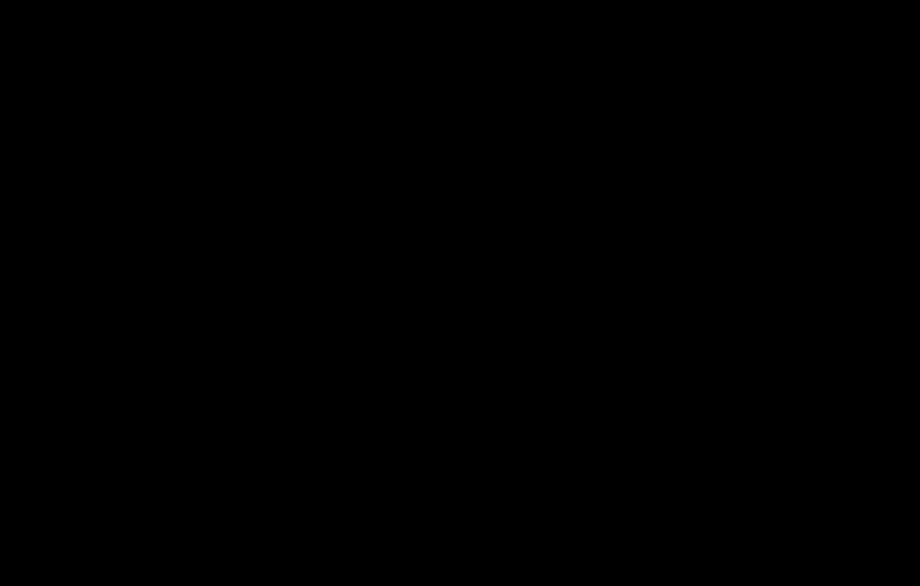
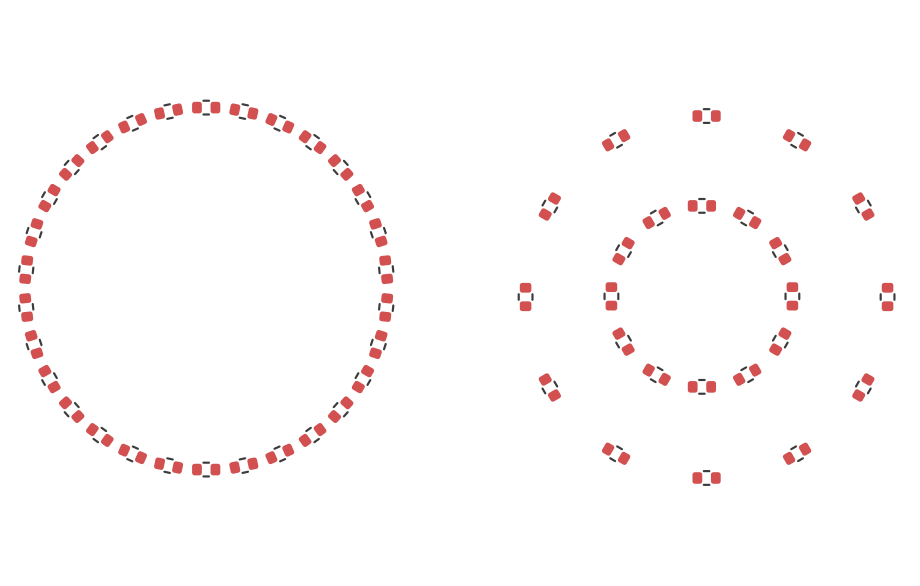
part: none -> (206, 107)
part: none -> (168, 111)
part: none -> (243, 111)
part: none -> (706, 116)
part: none -> (132, 123)
part: none -> (279, 123)
part: none -> (616, 140)
part: none -> (797, 140)
part: none -> (99, 142)
part: none -> (312, 142)
part: none -> (71, 167)
part: none -> (340, 167)
part: none -> (49, 198)
part: none -> (362, 198)
part: none -> (701, 205)
part: none -> (549, 206)
part: none -> (863, 206)
part: none -> (656, 218)
part: none -> (747, 218)
part: none -> (34, 232)
part: none -> (378, 232)
part: none -> (623, 251)
part: none -> (780, 251)
part: none -> (26, 269)
part: none -> (386, 269)
part: none -> (611, 296)
part: none -> (792, 296)
part: none -> (525, 297)
part: none -> (887, 297)
part: none -> (26, 307)
part: none -> (386, 307)
part: none -> (623, 341)
part: none -> (780, 341)
part: none -> (34, 344)
part: none -> (378, 344)
part: none -> (656, 374)
part: none -> (747, 374)
part: none -> (49, 379)
part: none -> (362, 379)
part: none -> (701, 386)
part: none -> (549, 387)
part: none -> (863, 387)
part: none -> (71, 409)
part: none -> (340, 409)
part: none -> (99, 435)
part: none -> (312, 435)
part: none -> (132, 453)
part: none -> (279, 453)
part: none -> (616, 453)
part: none -> (797, 453)
part: none -> (168, 465)
part: none -> (243, 465)
part: none -> (206, 469)
part: none -> (706, 477)

